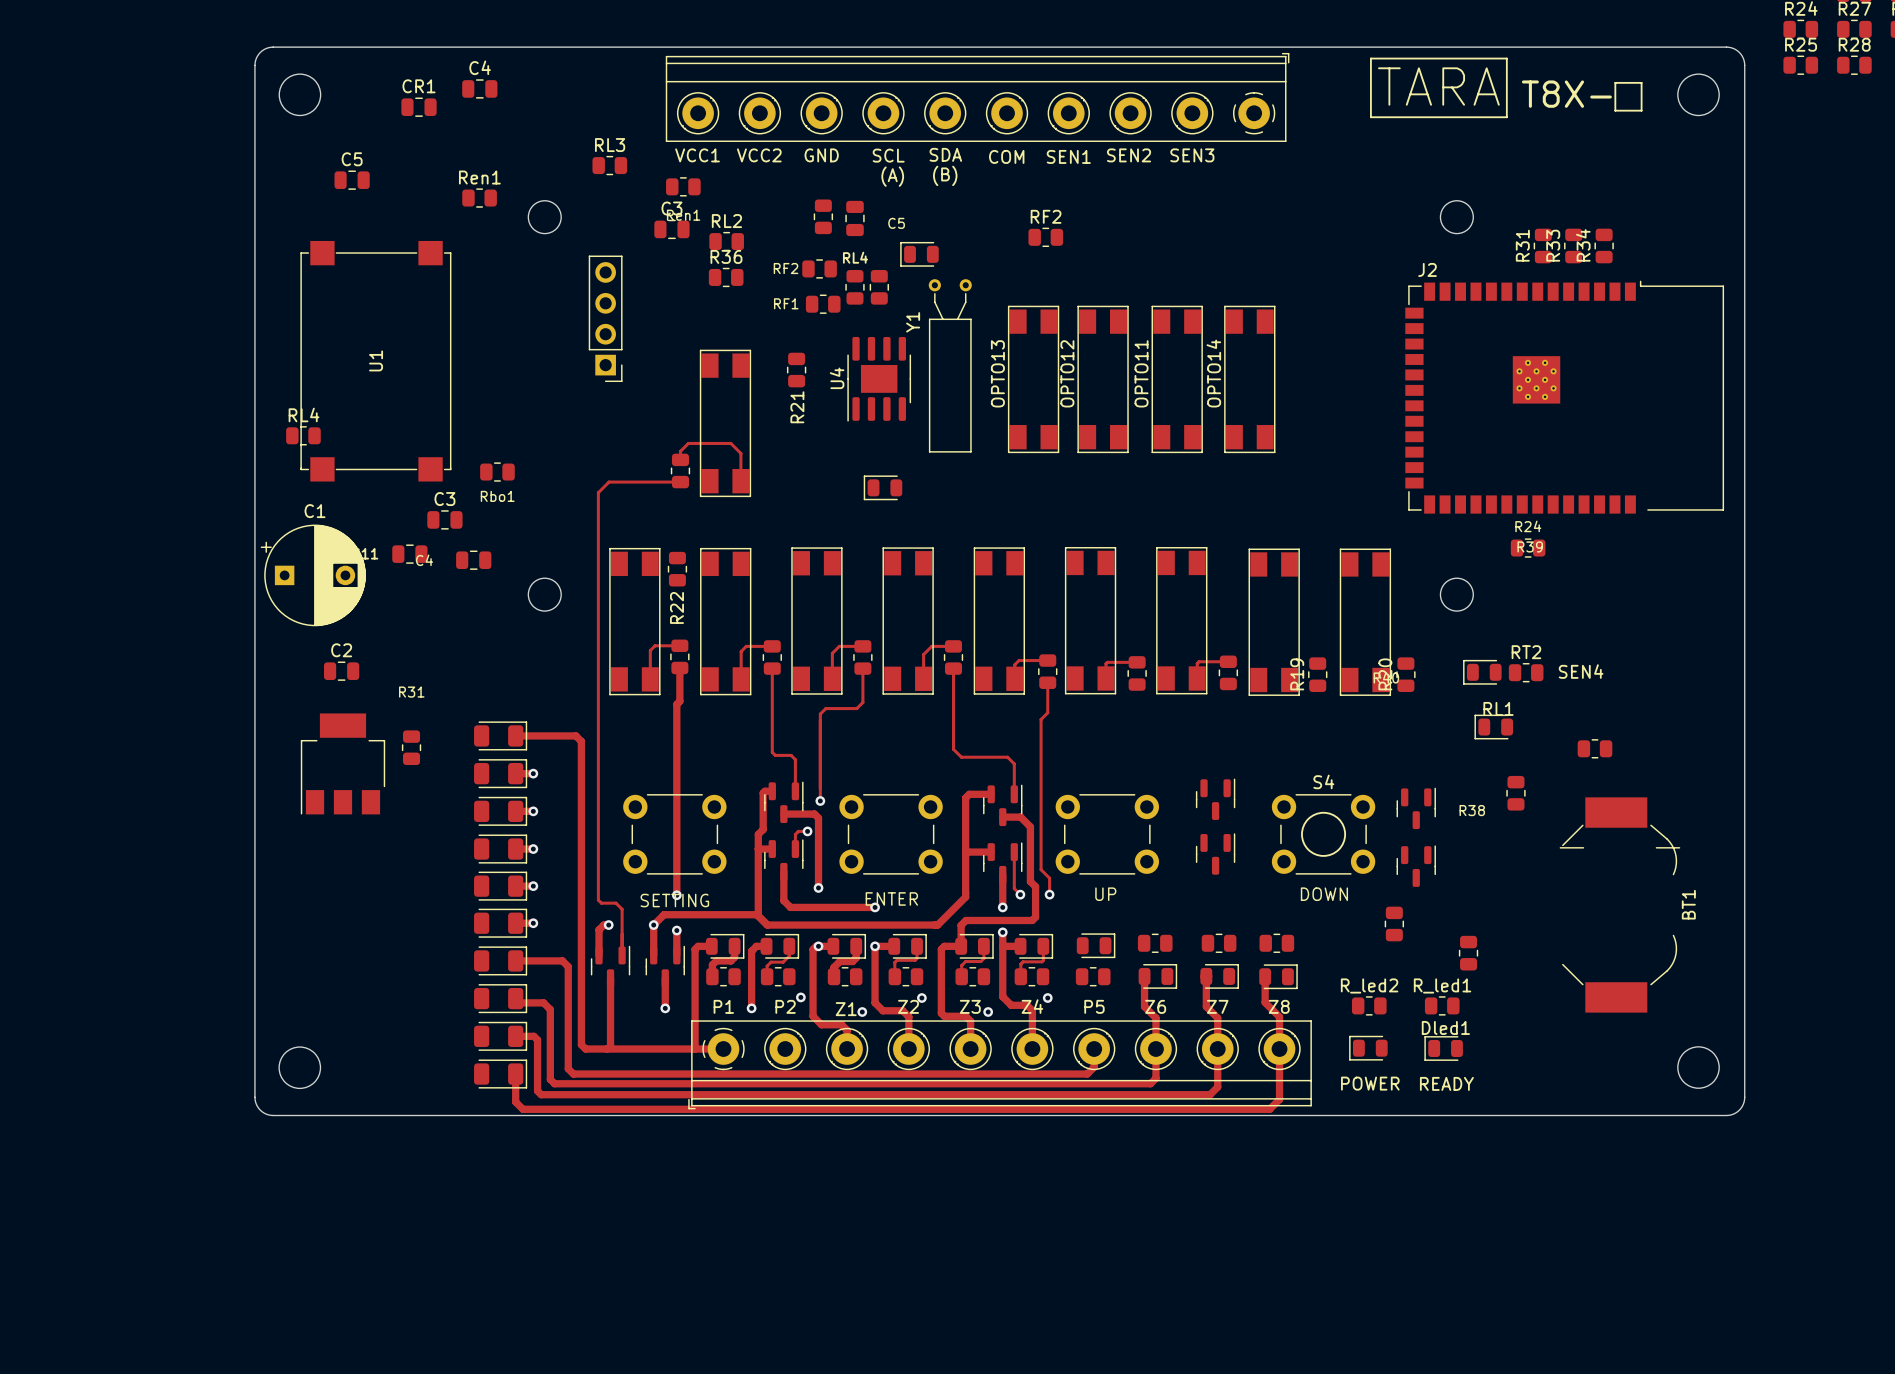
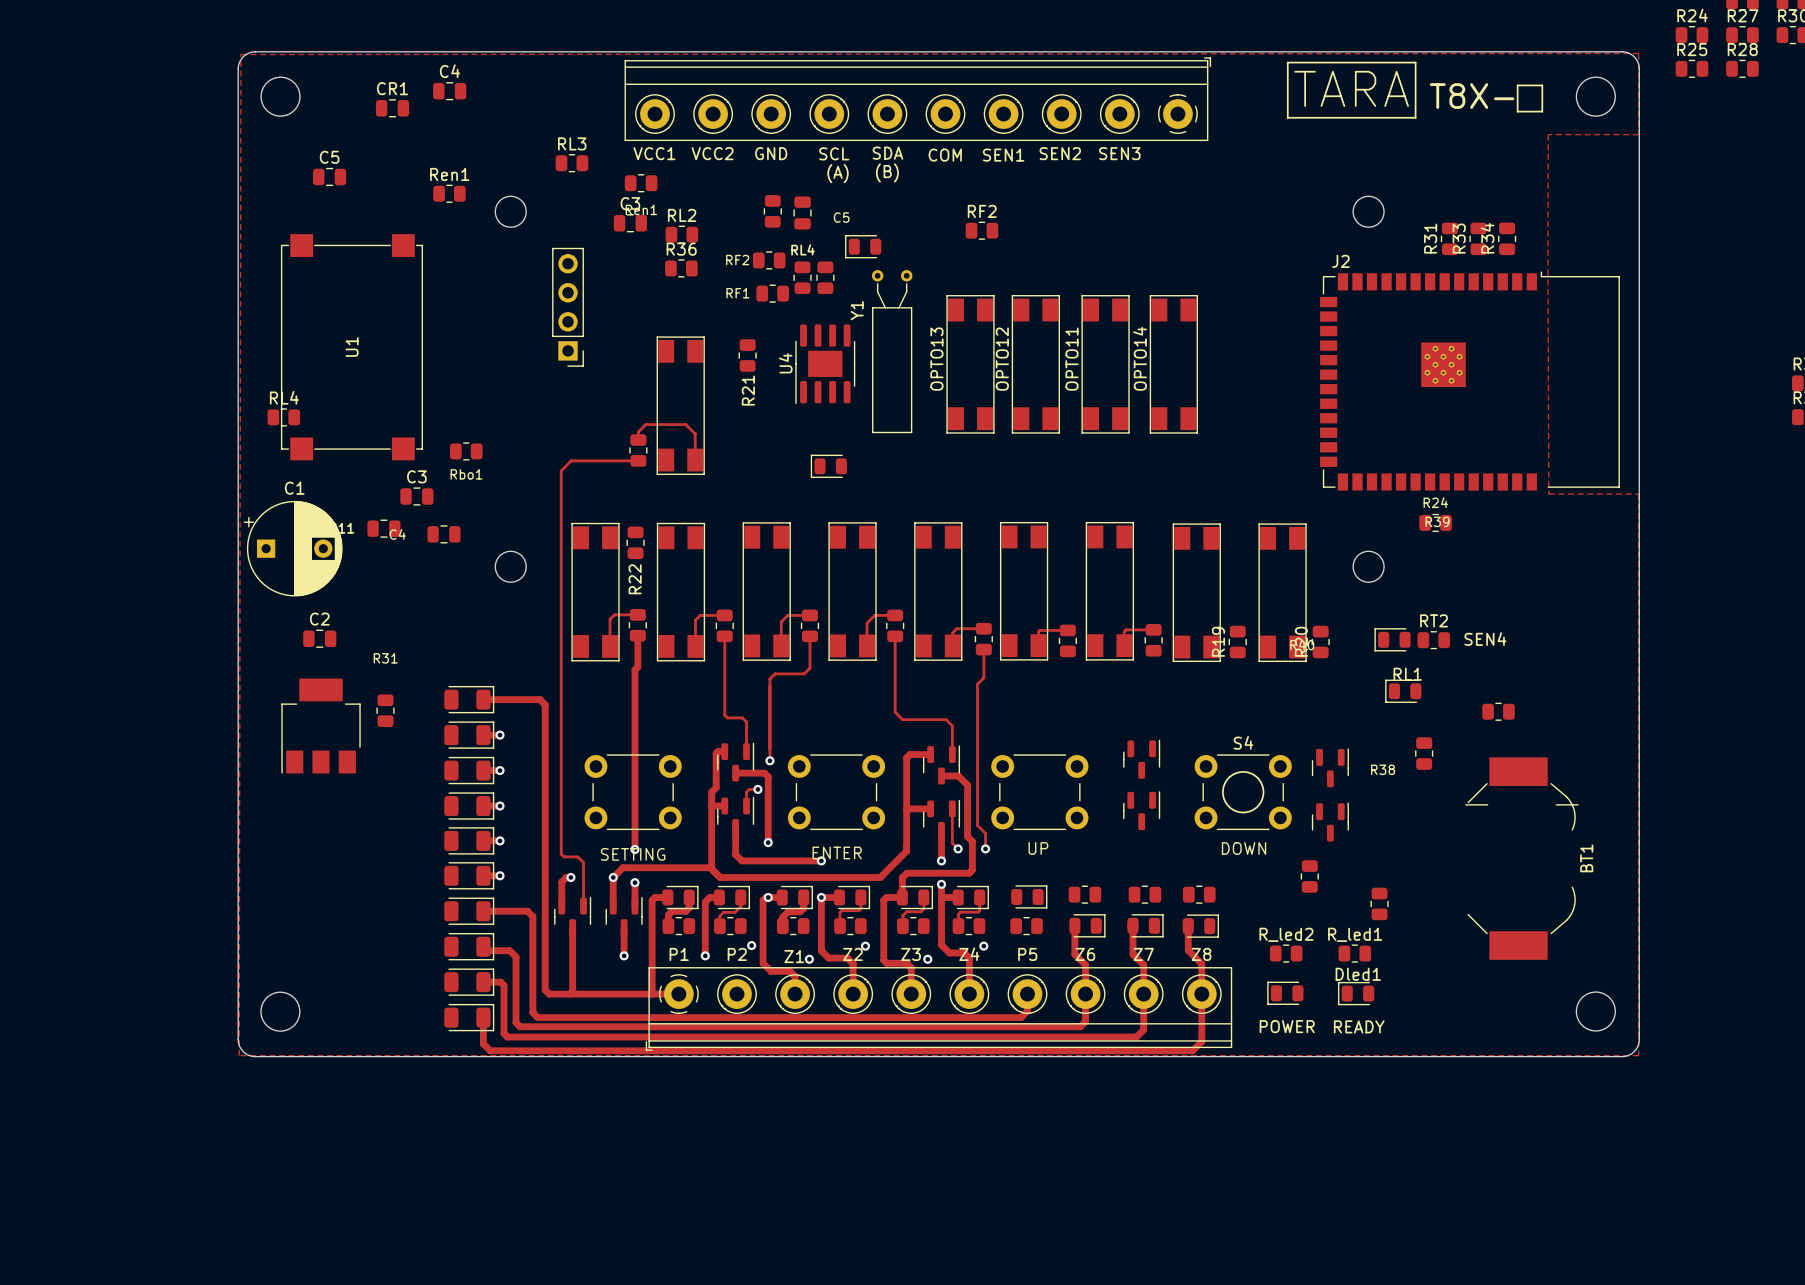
zone outline: none -> (1638, 53) (240, 54) (239, 1055) (1638, 1055) (1638, 494) (1548, 494) (1547, 269) (1548, 134) (1638, 134) (1638, 53)

